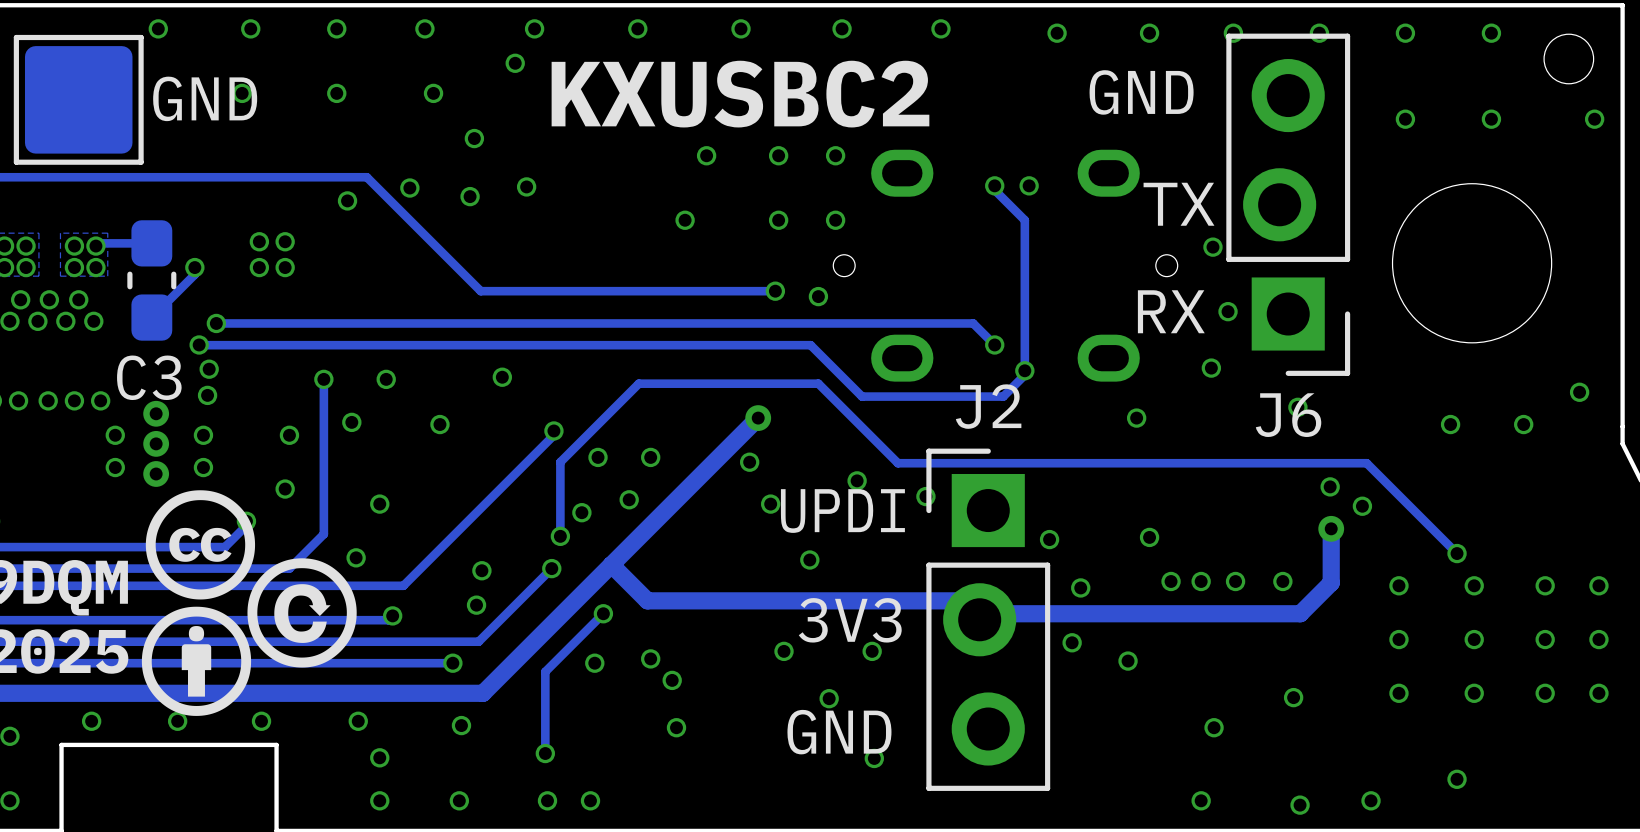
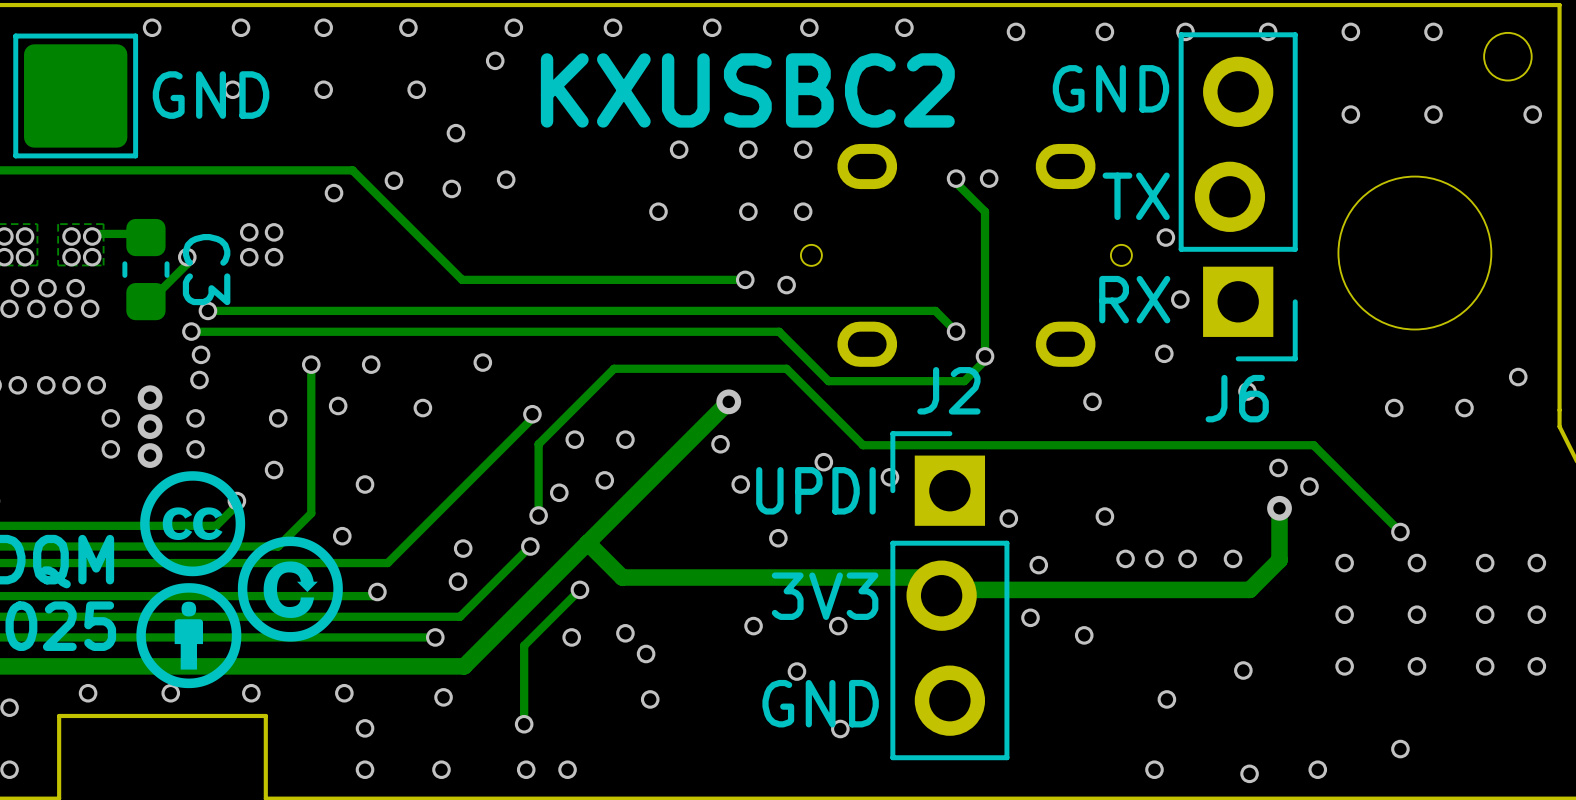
C3 footprint: [127, 220, 177, 341] -> [122, 218, 170, 321]
C3 name rotation: 0° (149, 377) -> 90° clockwise (206, 269)
C3 name position: C3 (149, 377) -> C3 (206, 269)

